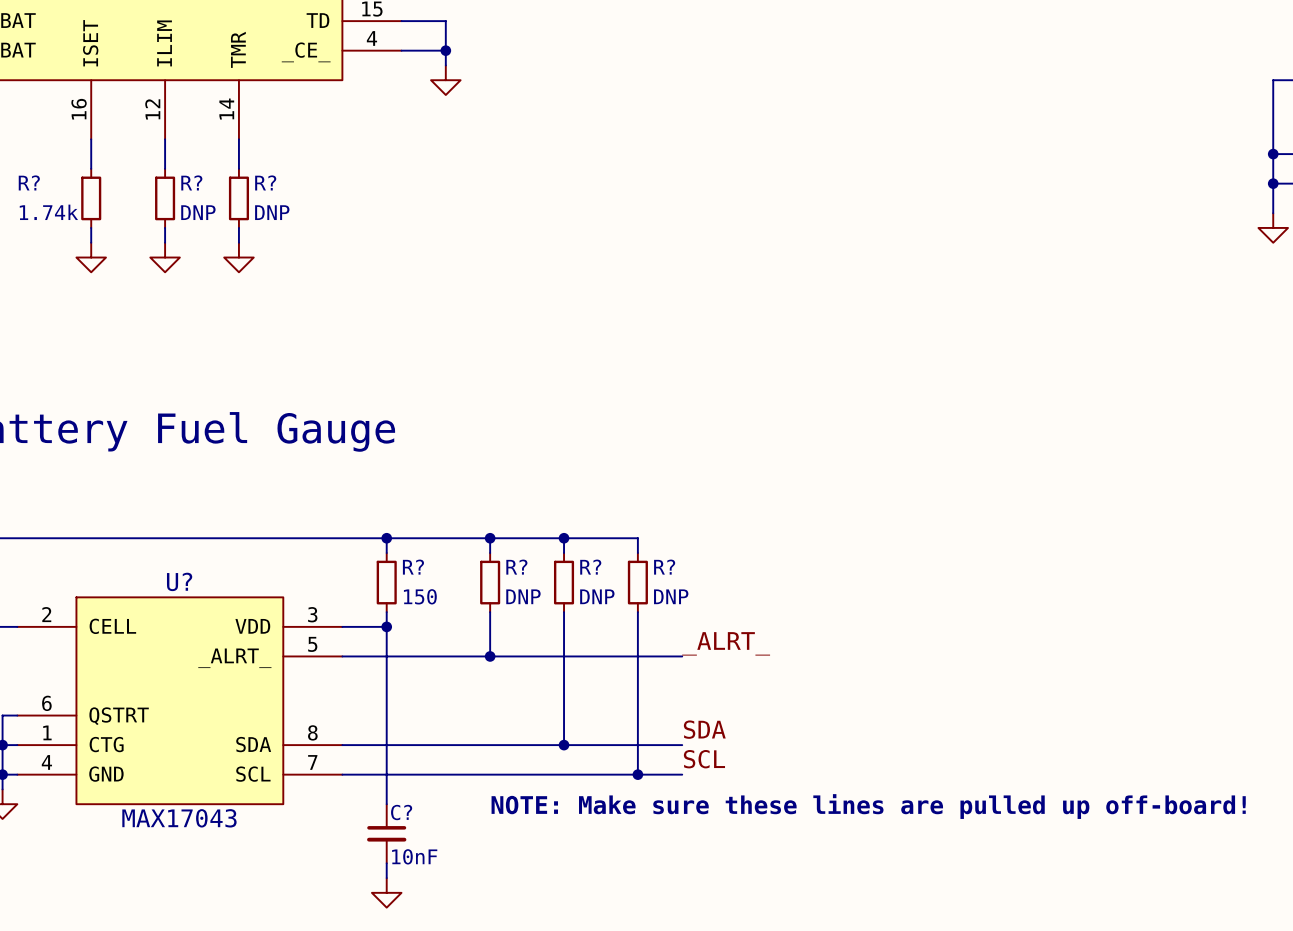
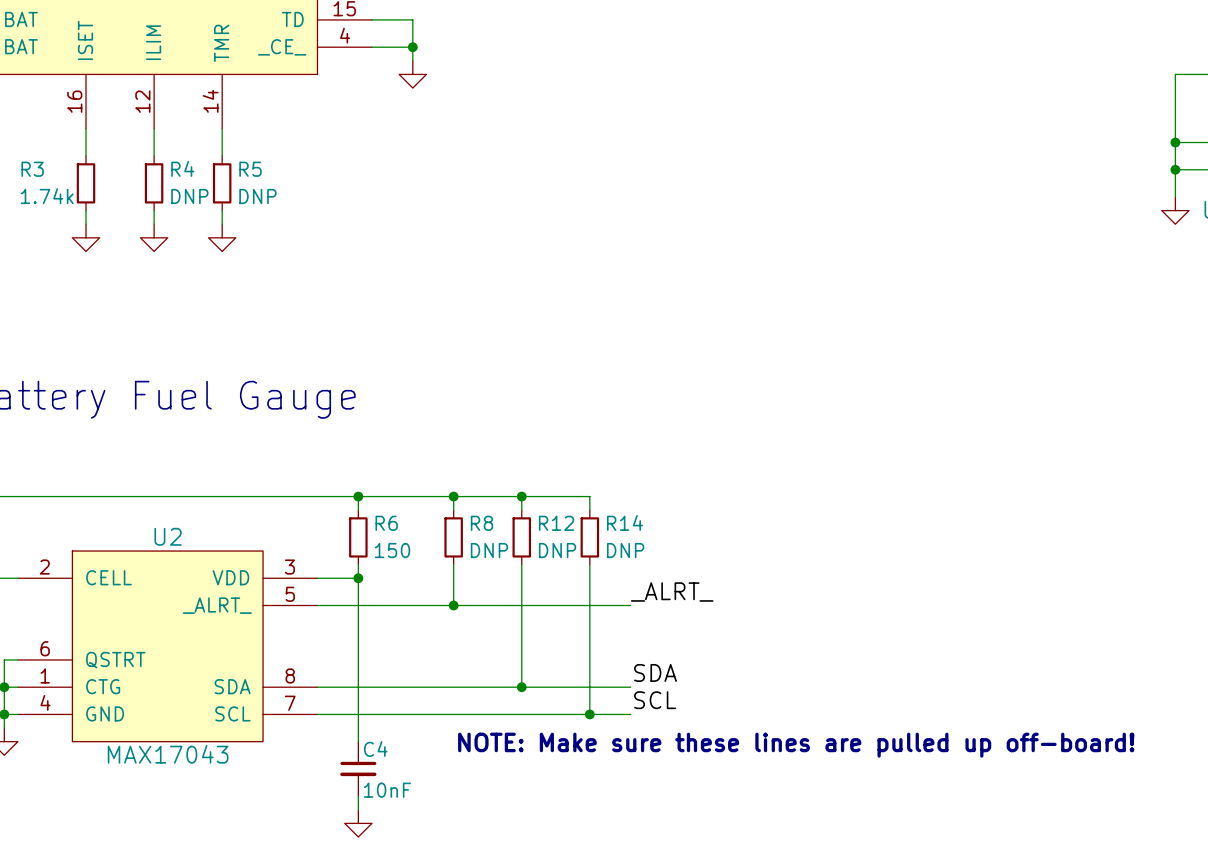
R? name: R? (29, 182) -> R3 (32, 169)
R? name: R? (191, 182) -> R4 (182, 168)
R? name: R? (265, 182) -> R5 (250, 169)
R? name: R? (413, 567) -> R6 (386, 523)
R? name: R? (516, 567) -> R8 (481, 523)
R? name: R? (590, 567) -> R12 (556, 523)
R? name: R? (664, 567) -> R14 (624, 522)
U? name: U? (179, 581) -> U2 (168, 536)
C? name: C? (401, 812) -> C4 (375, 749)

